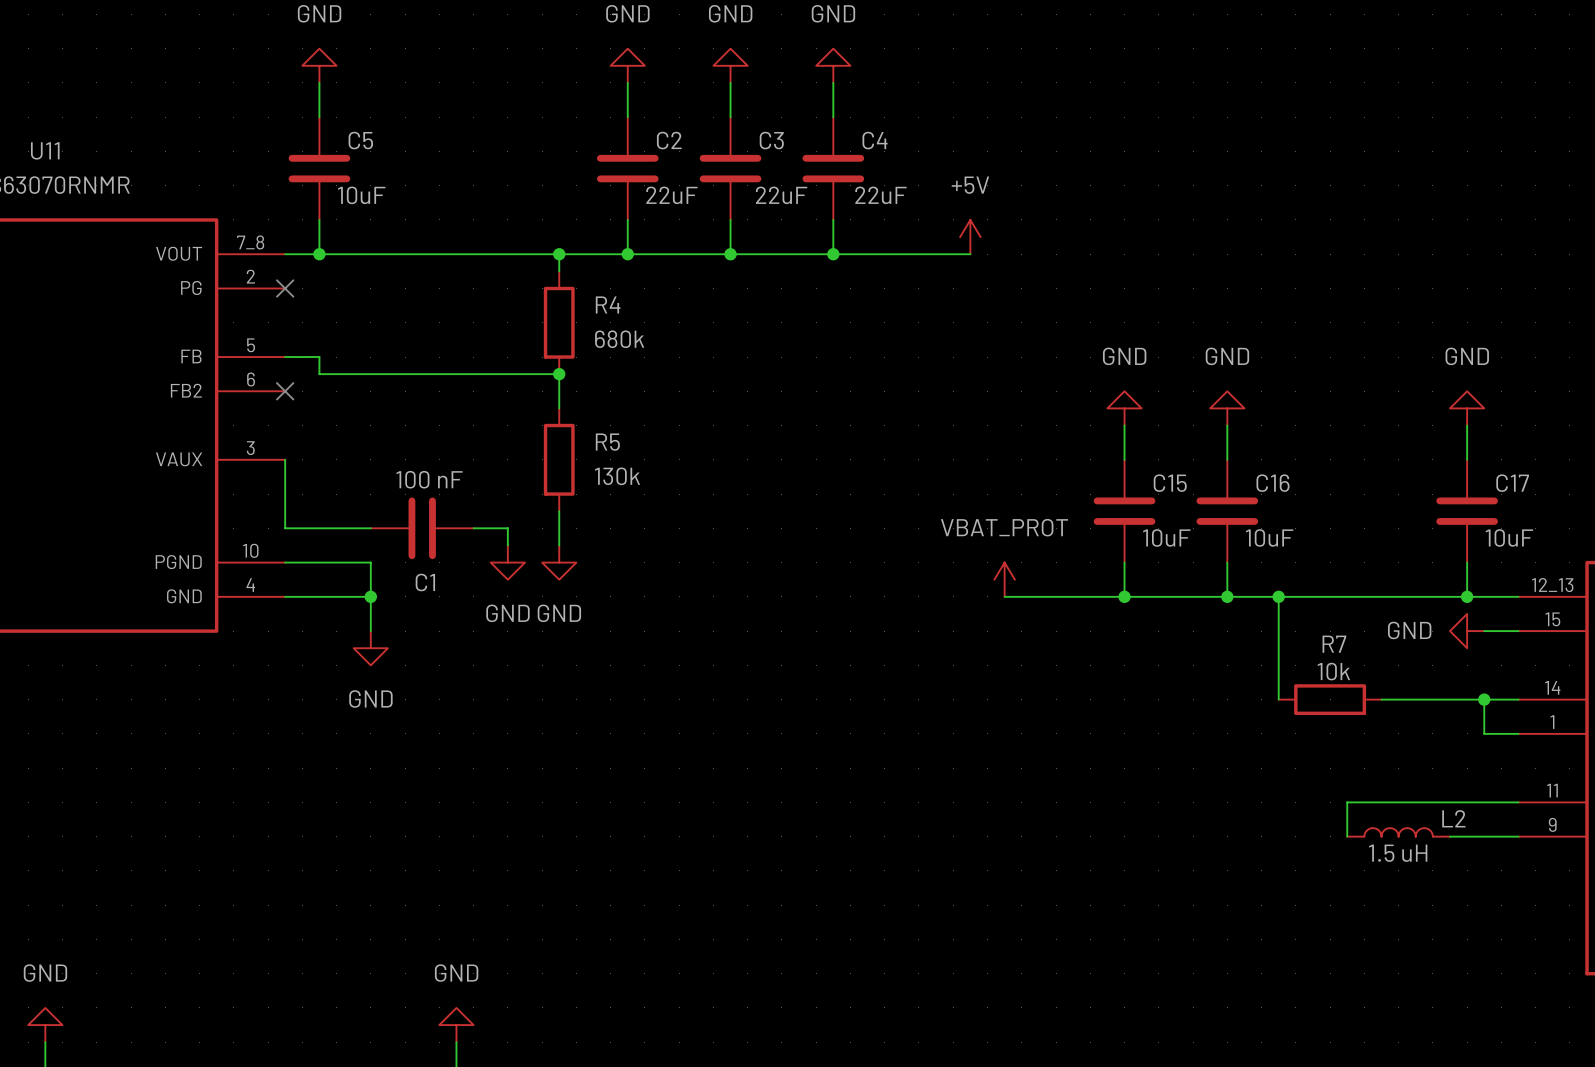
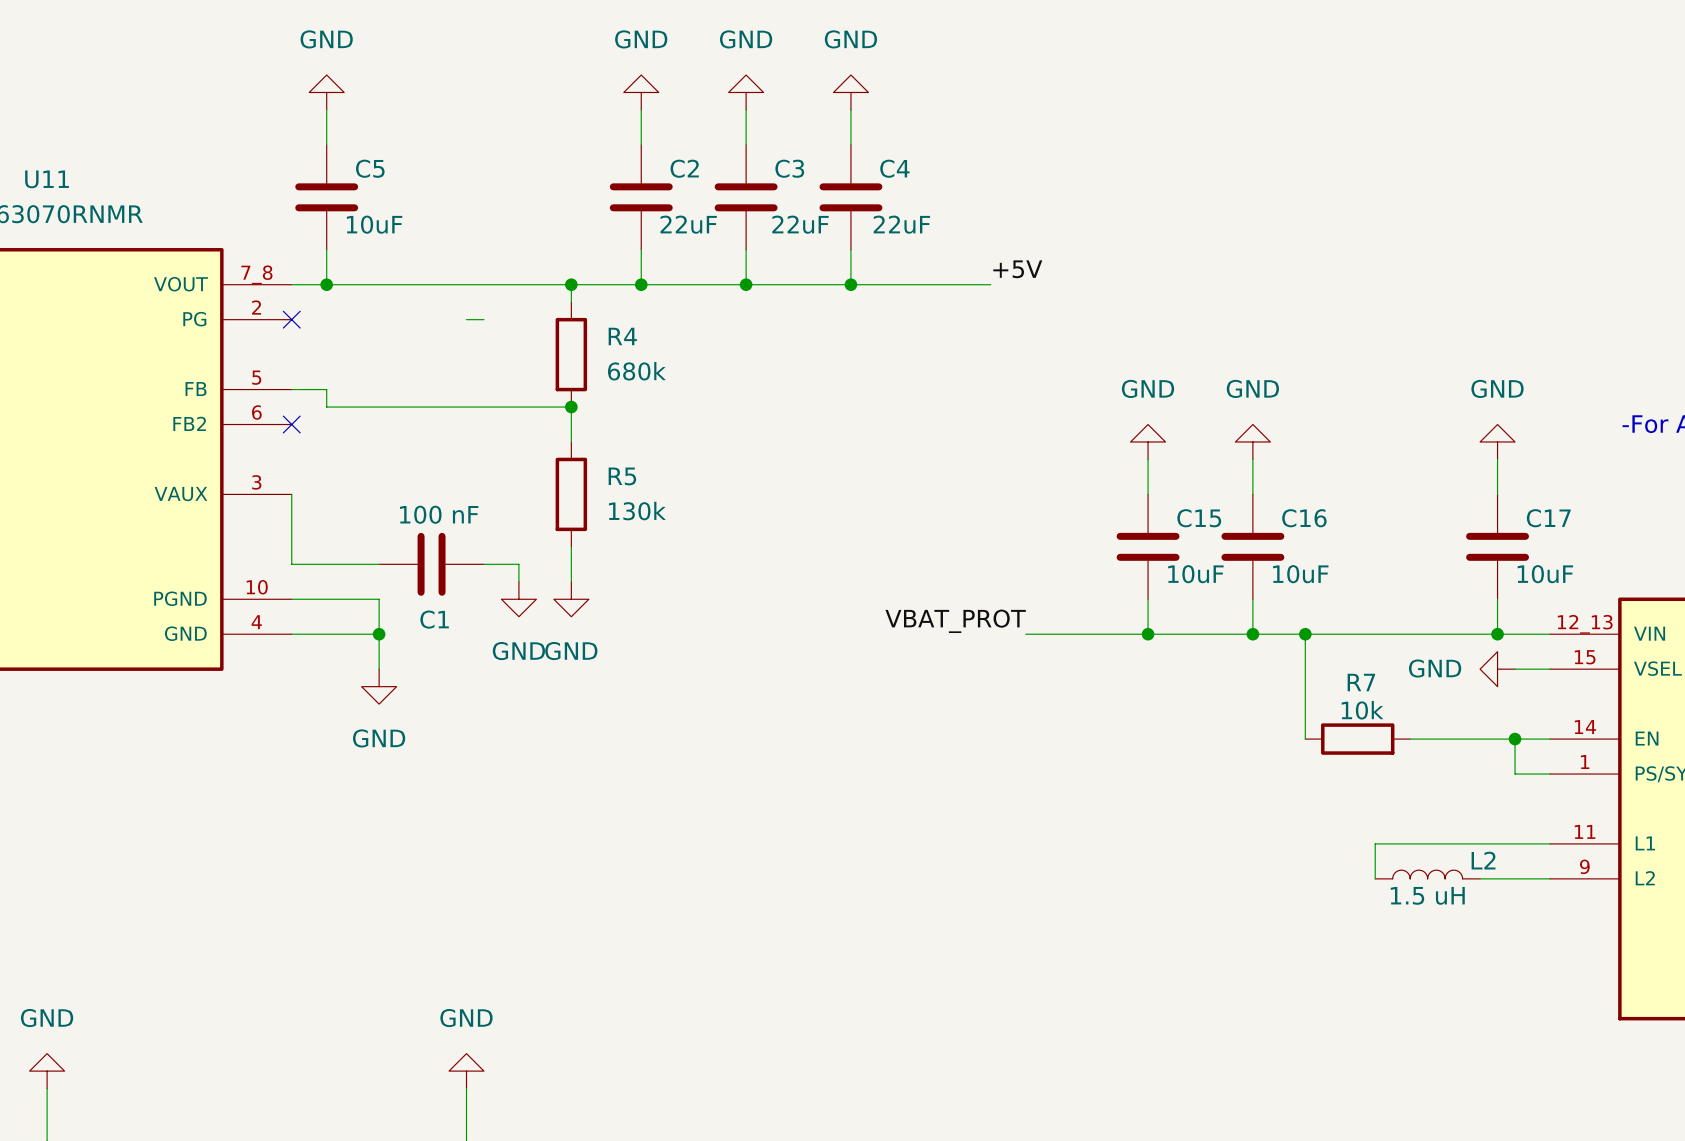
power symbol: +5V (970, 237) -> none
label: none -> +5V (1017, 269)
wire: none -> (466, 319) (483, 319)
power symbol: VBAT_PROT (1004, 579) -> none
label: none -> VBAT_PROT (955, 621)

